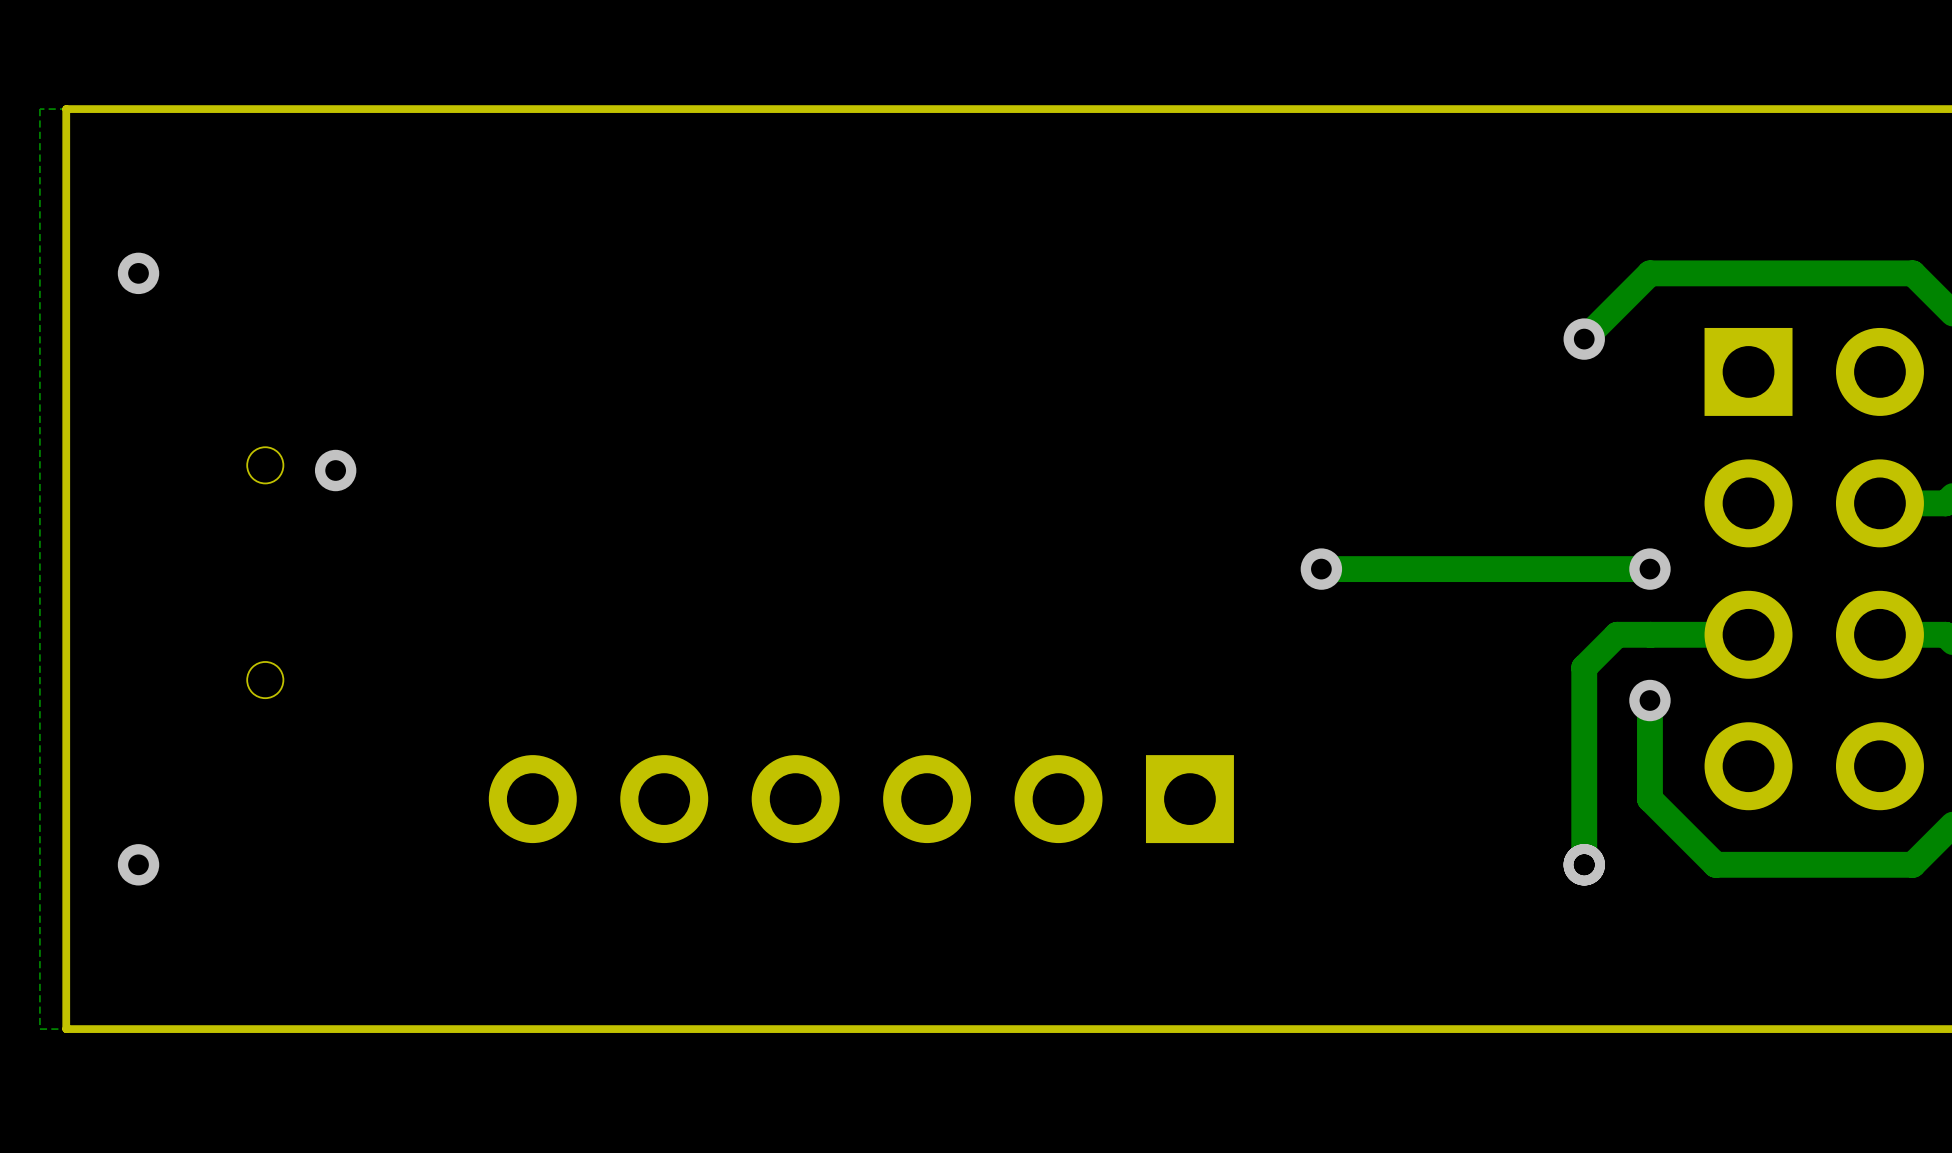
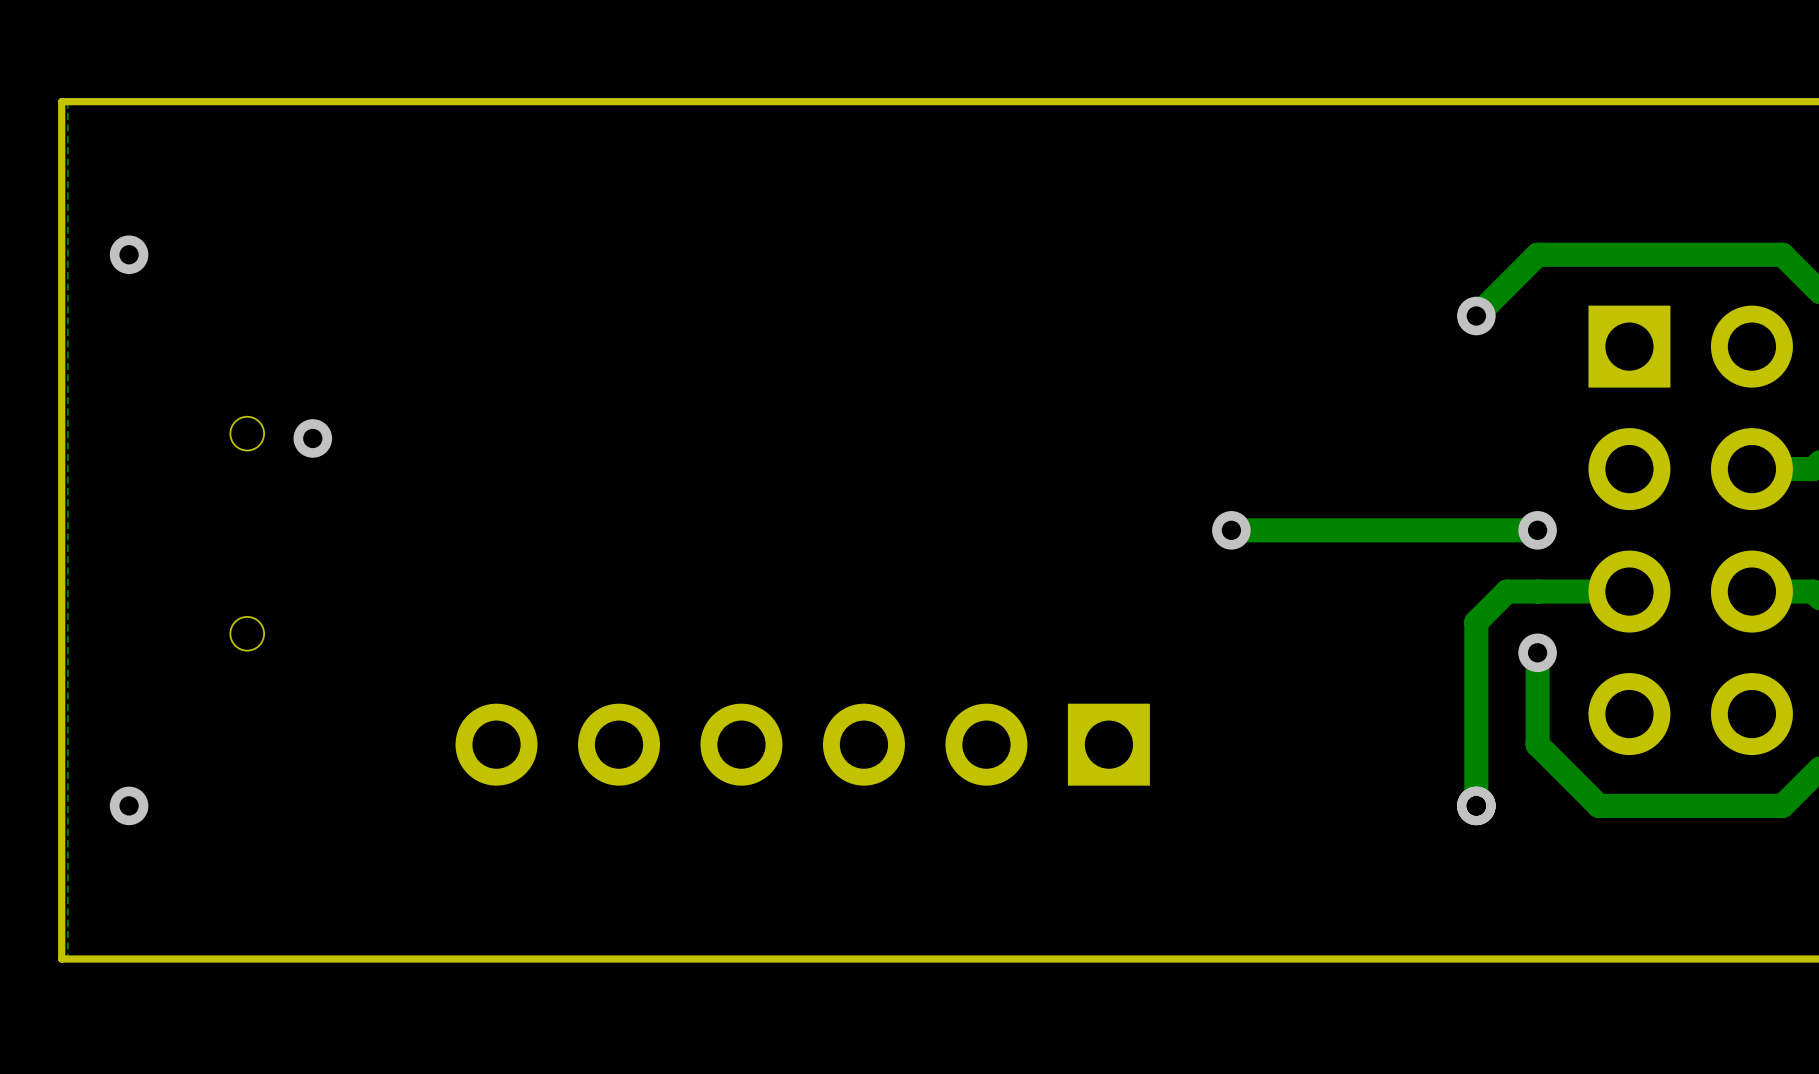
zone outline: (72, 109) (39, 109) (39, 1029) (72, 1029) -> (67, 101) (67, 959)

